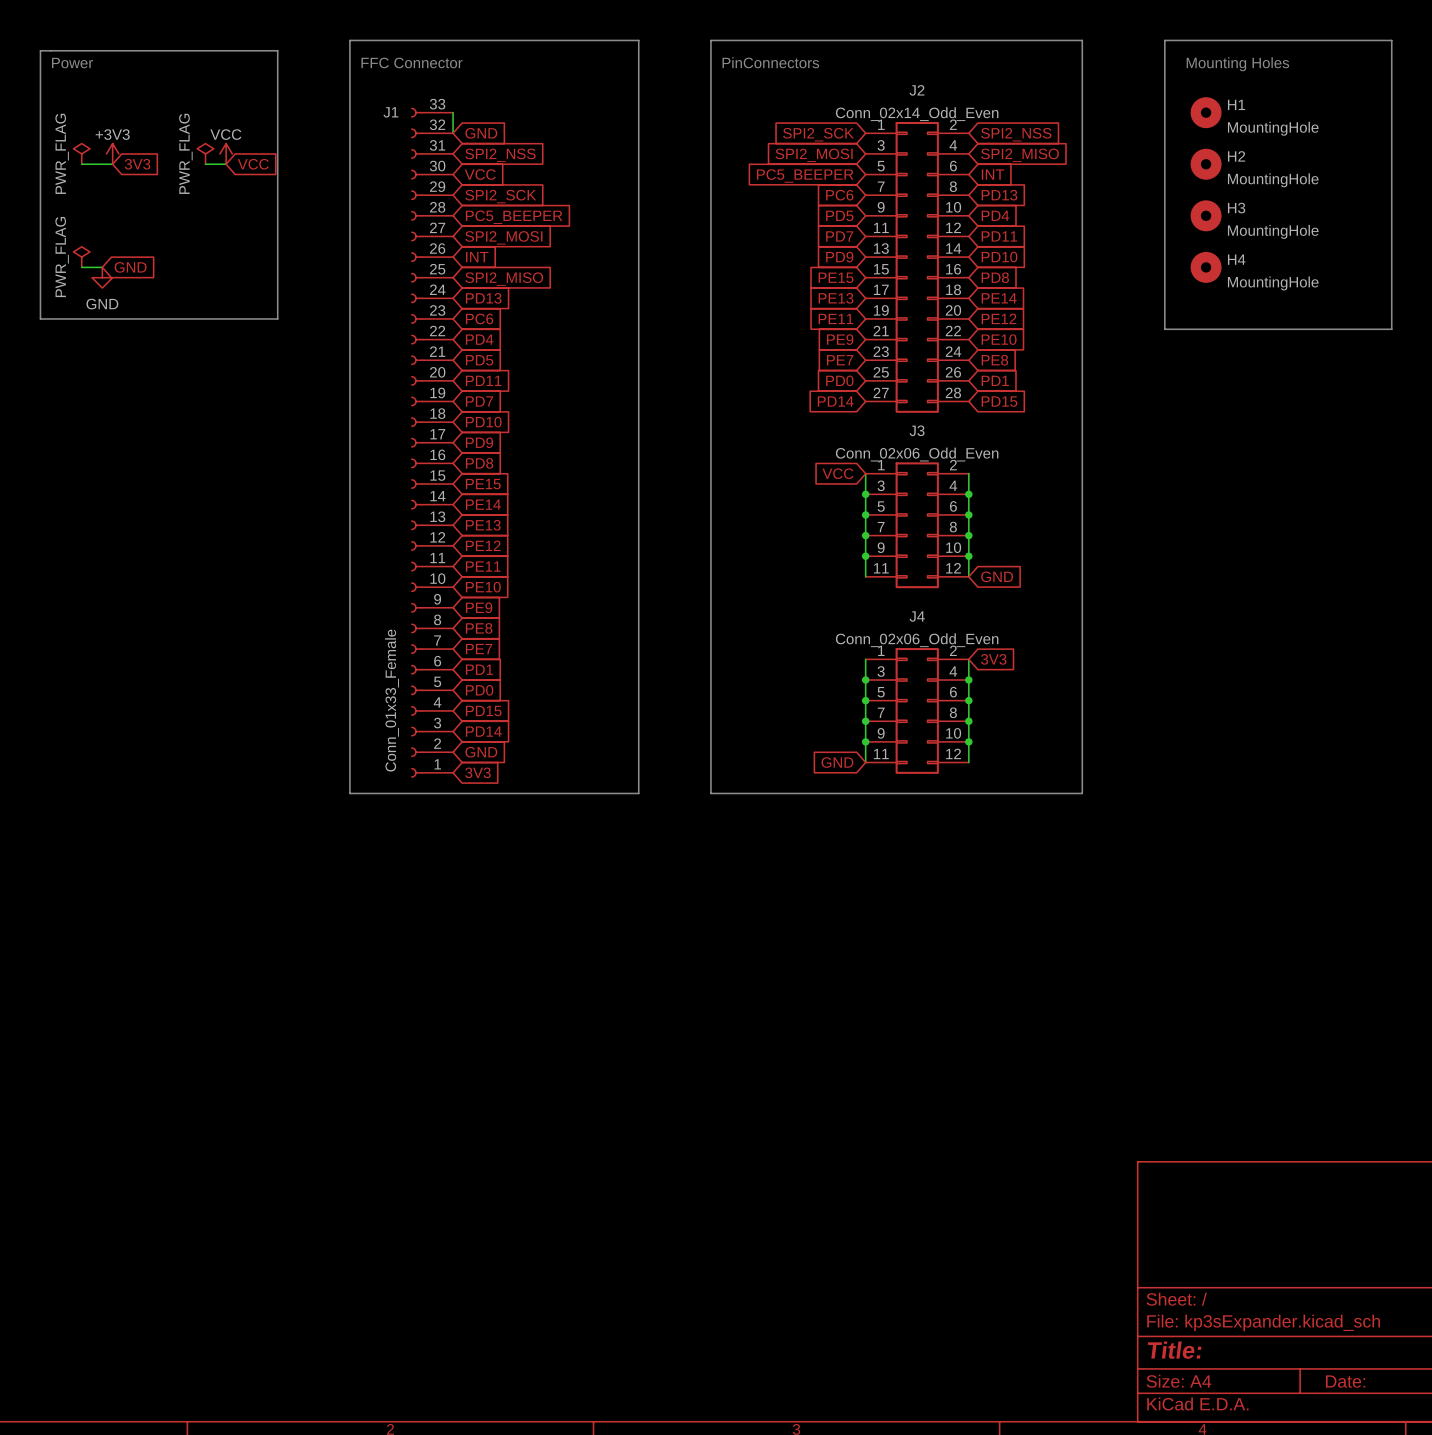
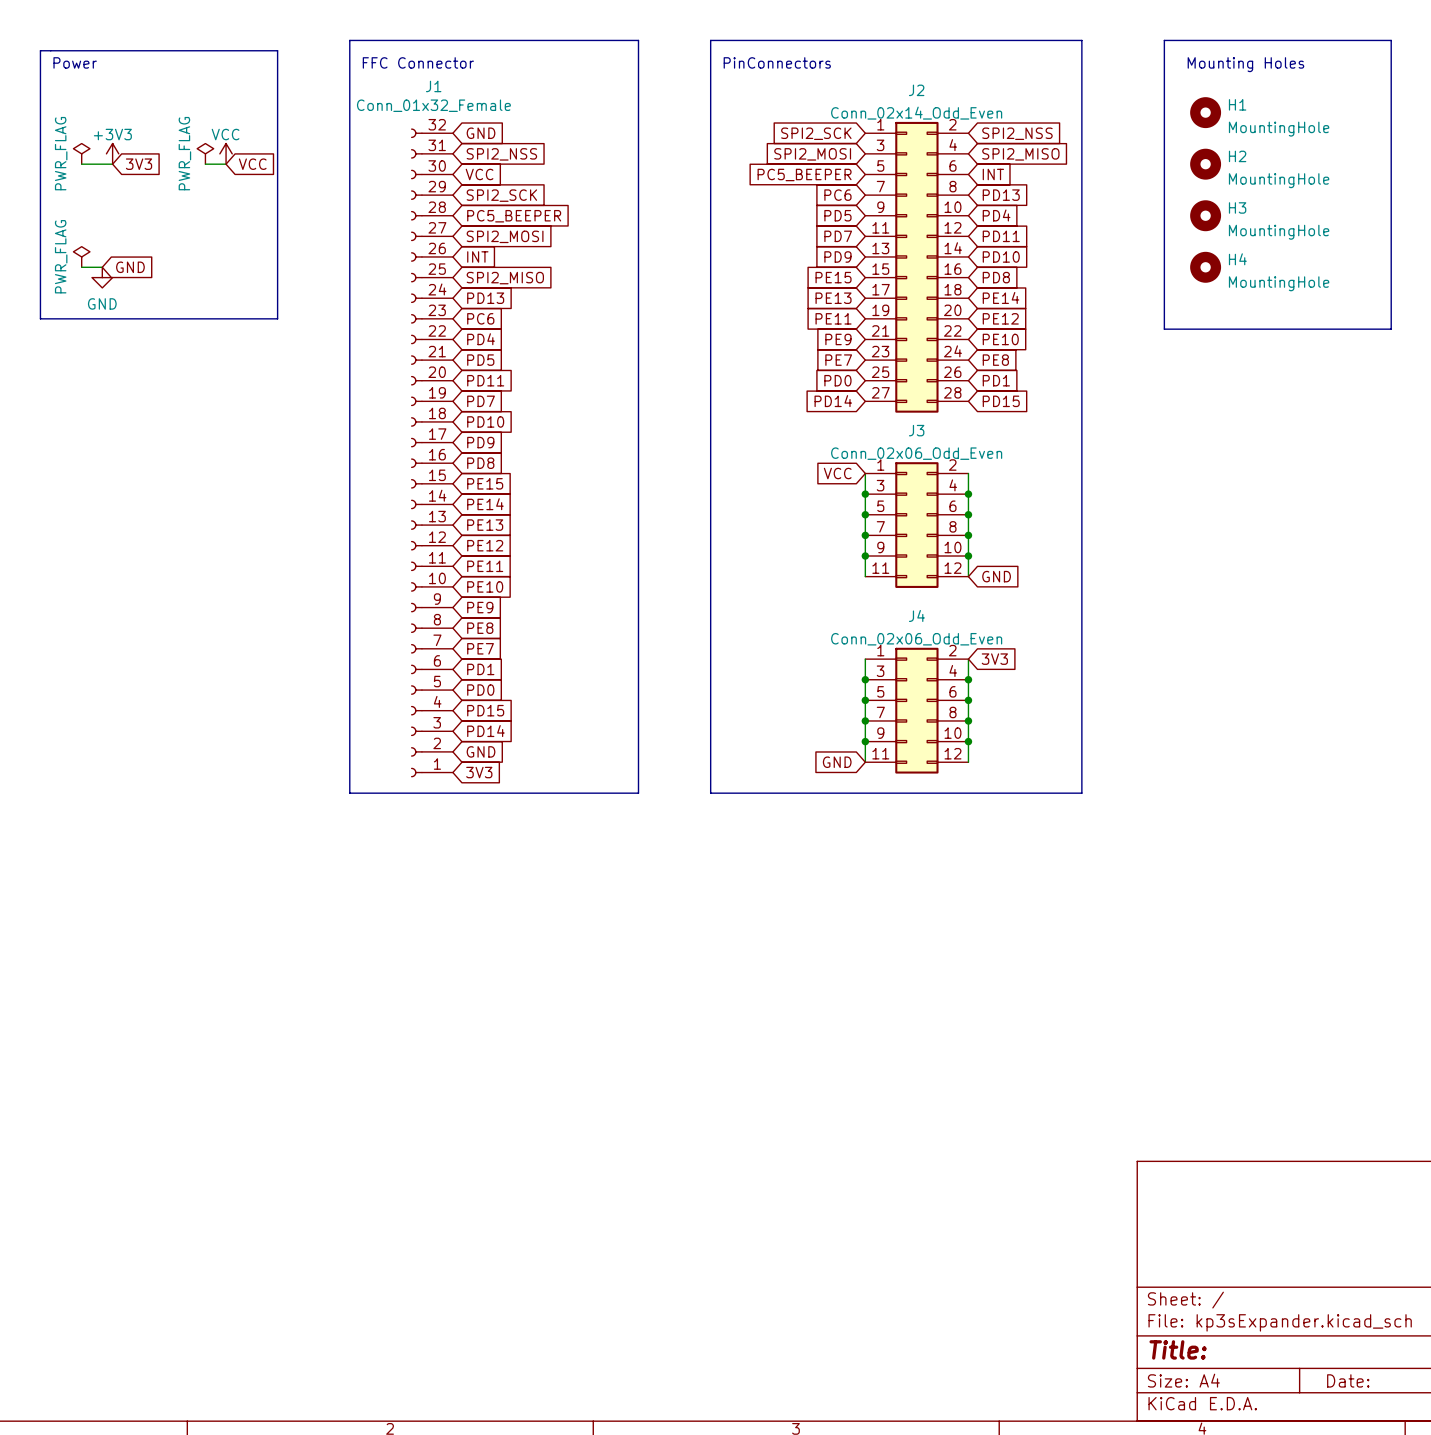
J1 symbol: [411, 107, 454, 778] -> [411, 128, 453, 778]
J1 name position: J1 (390, 112) -> J1 (433, 86)
wire: (453, 112) (453, 133) -> none
J1 value: Conn_01x33_Female (392, 700) -> Conn_01x32_Female (433, 105)

